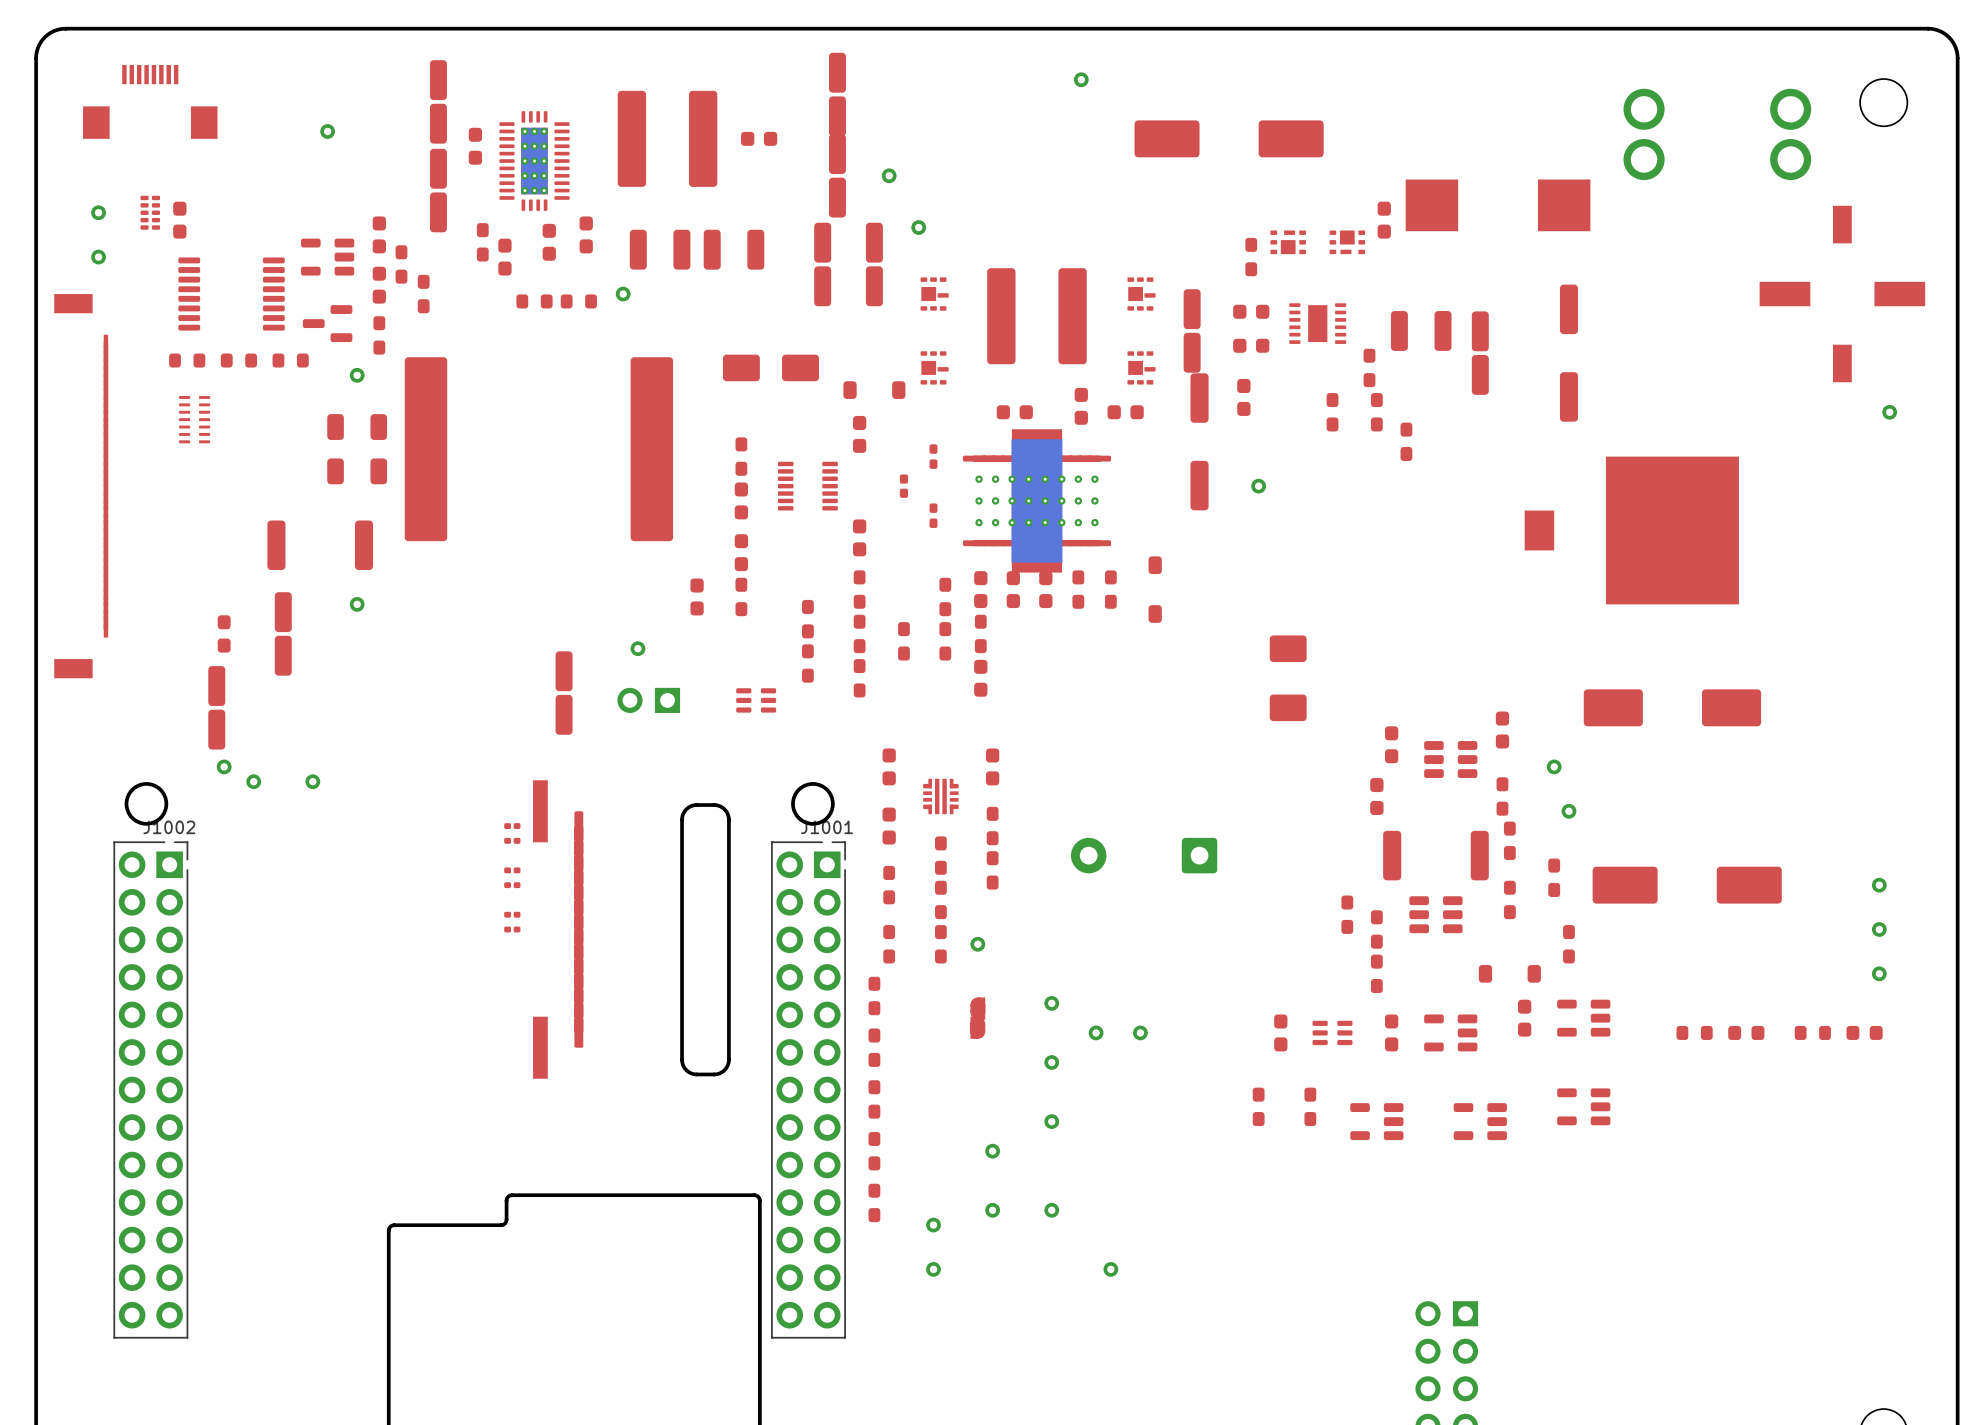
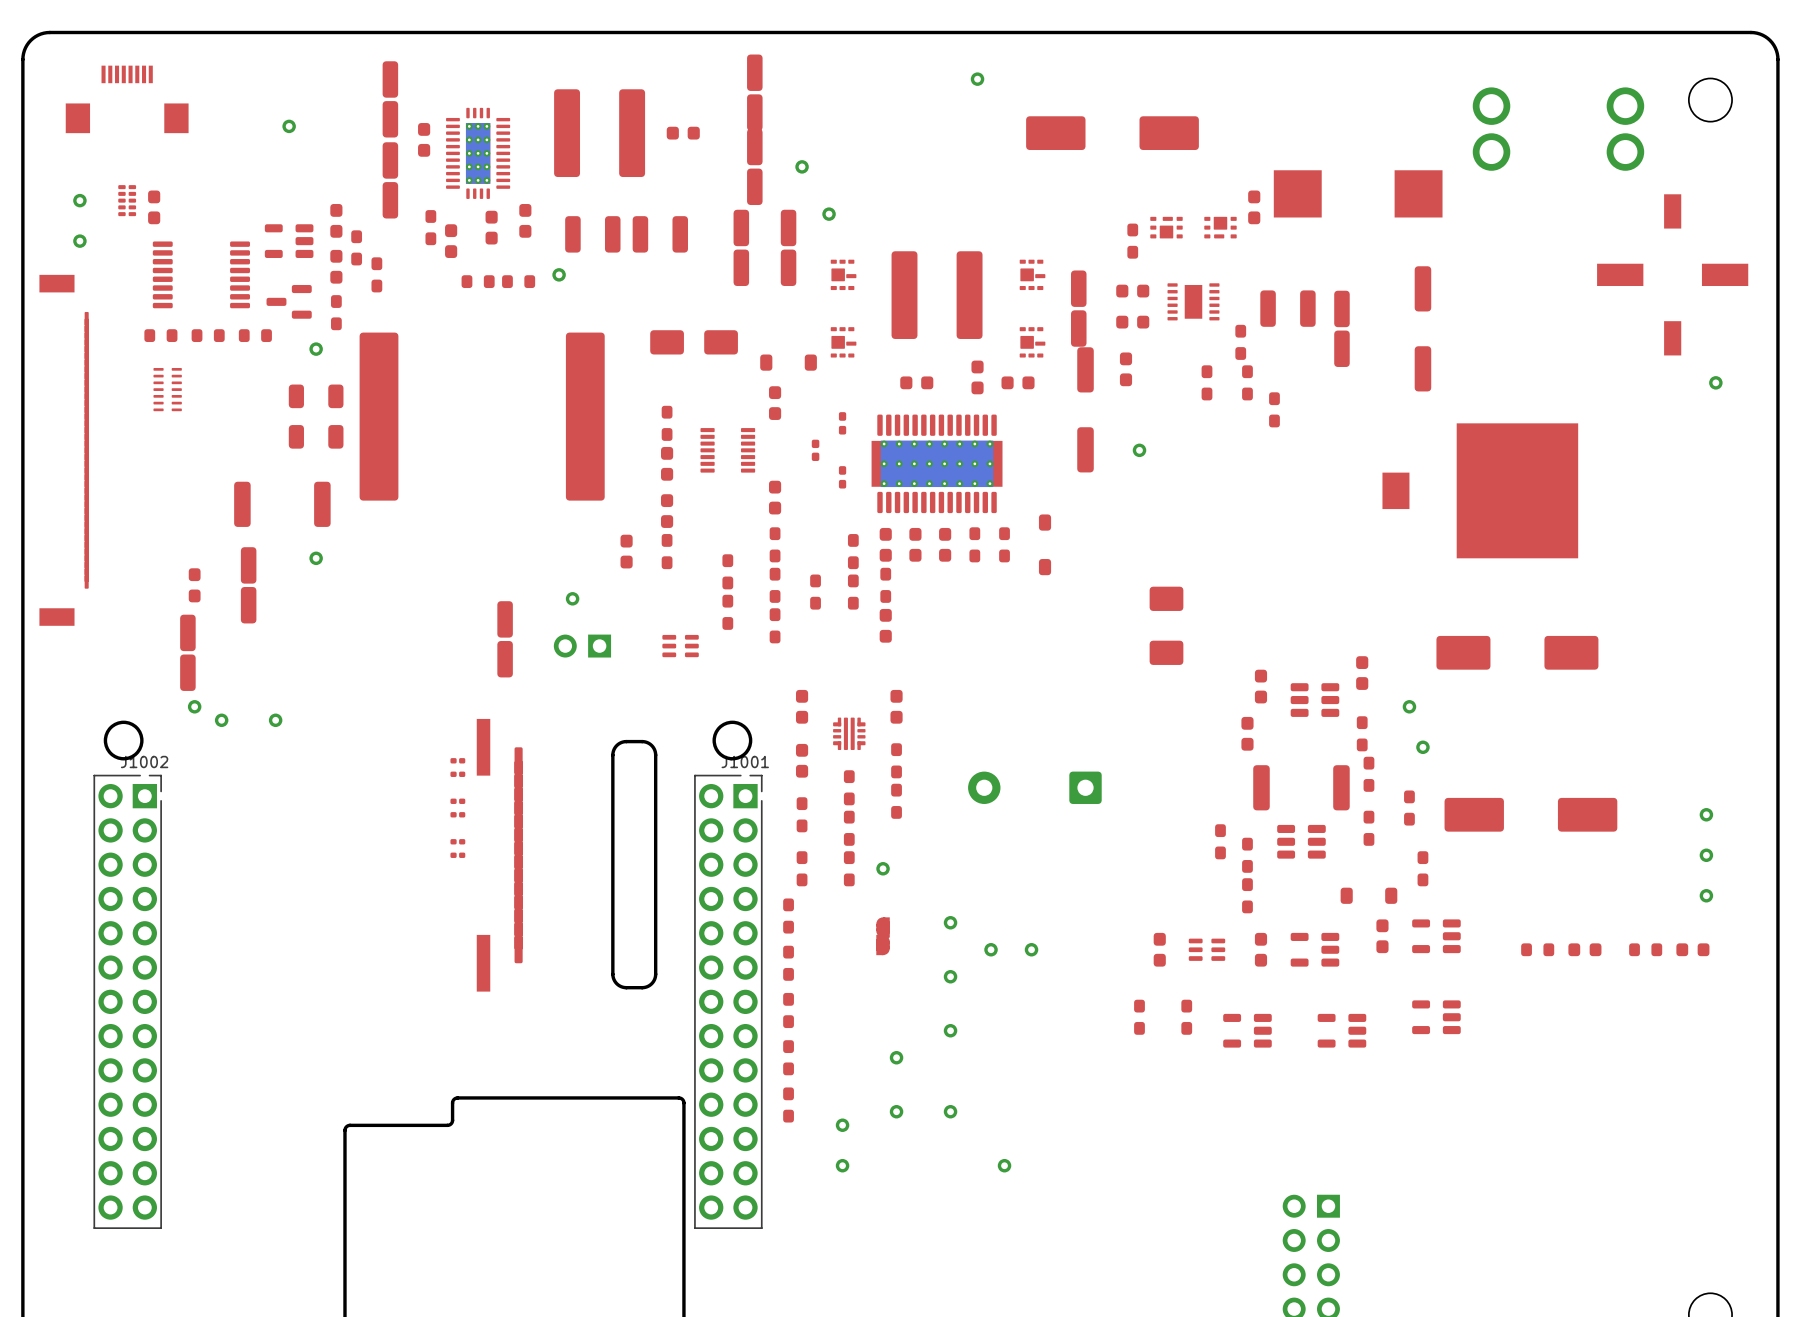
part footprint: [962, 429, 1112, 573] -> [871, 414, 1003, 514]

